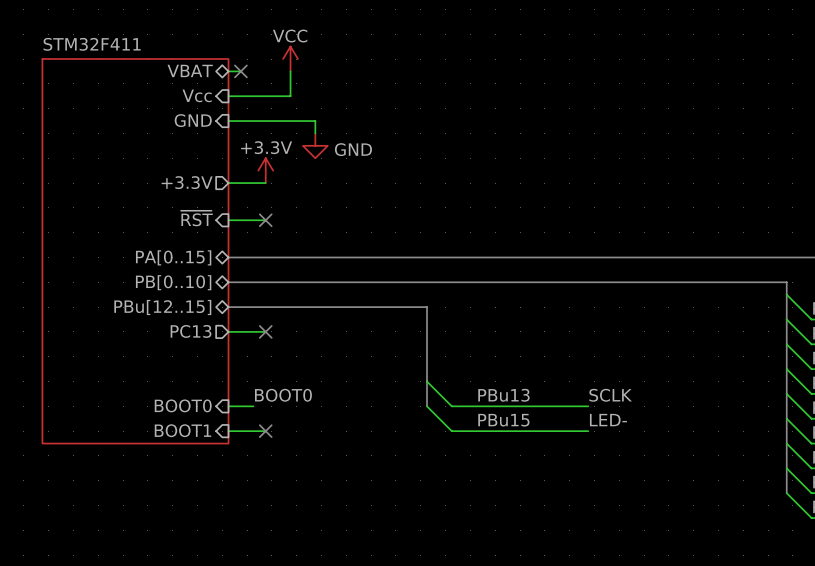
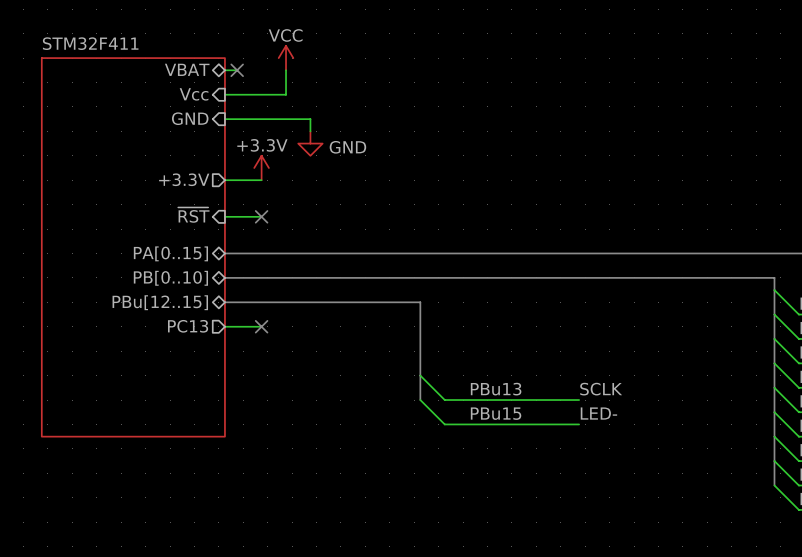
label: BOOT0 (283, 395) -> none
sheet pin: BOOT0 (183, 405) -> none
wire: (228, 406) (253, 406) -> none
sheet pin: BOOT1 (182, 430) -> none
wire: (228, 431) (265, 431) -> none
no-connect mark: (265, 431) -> none

